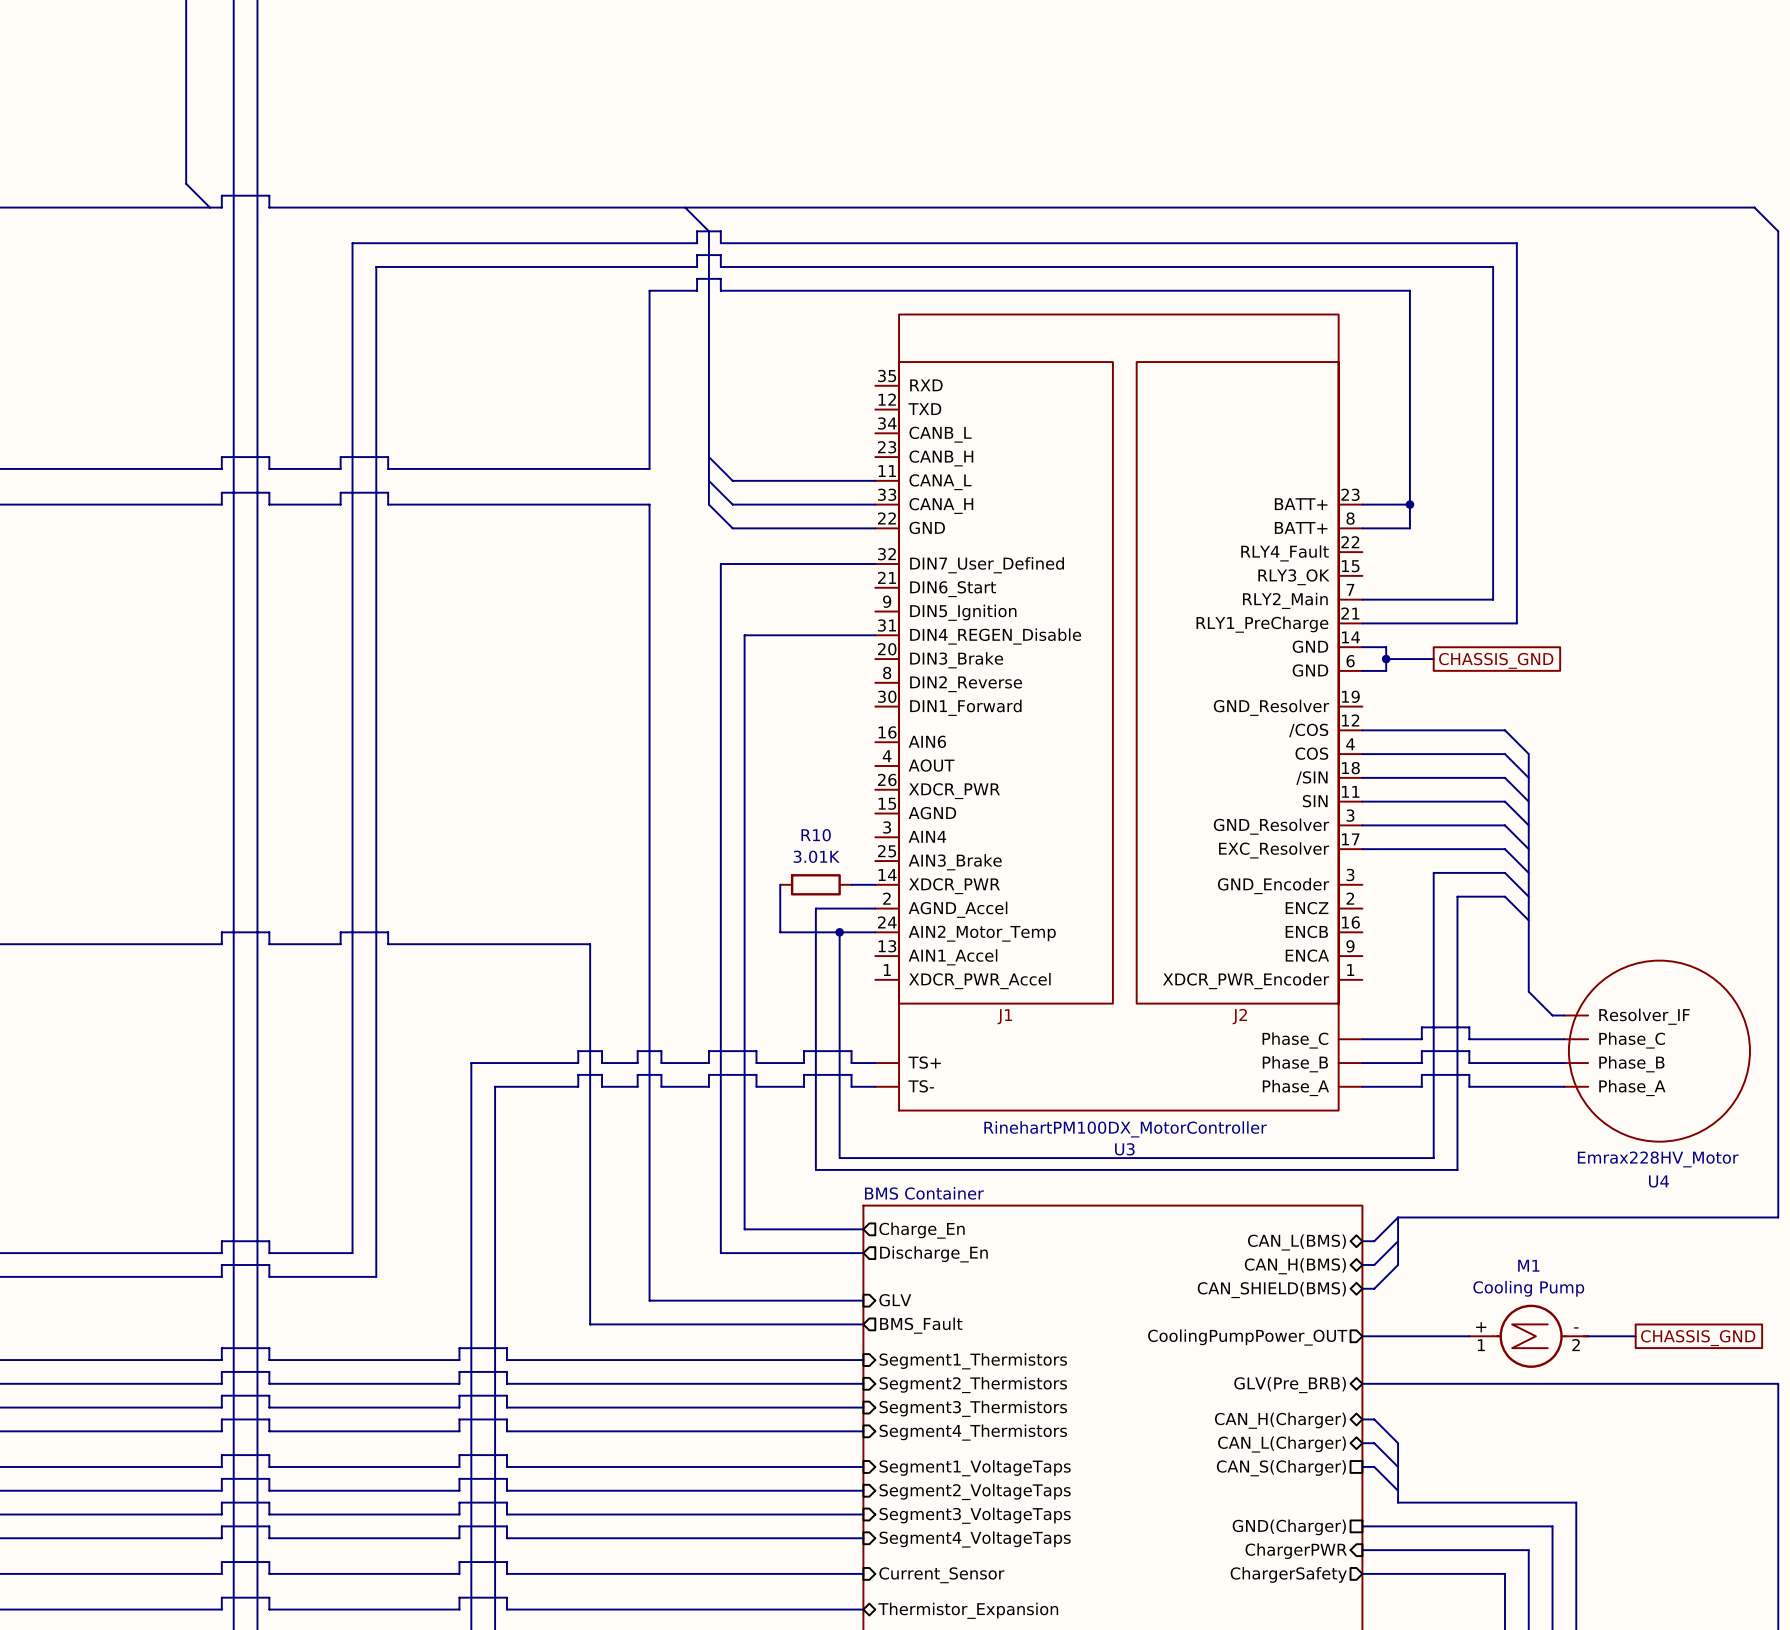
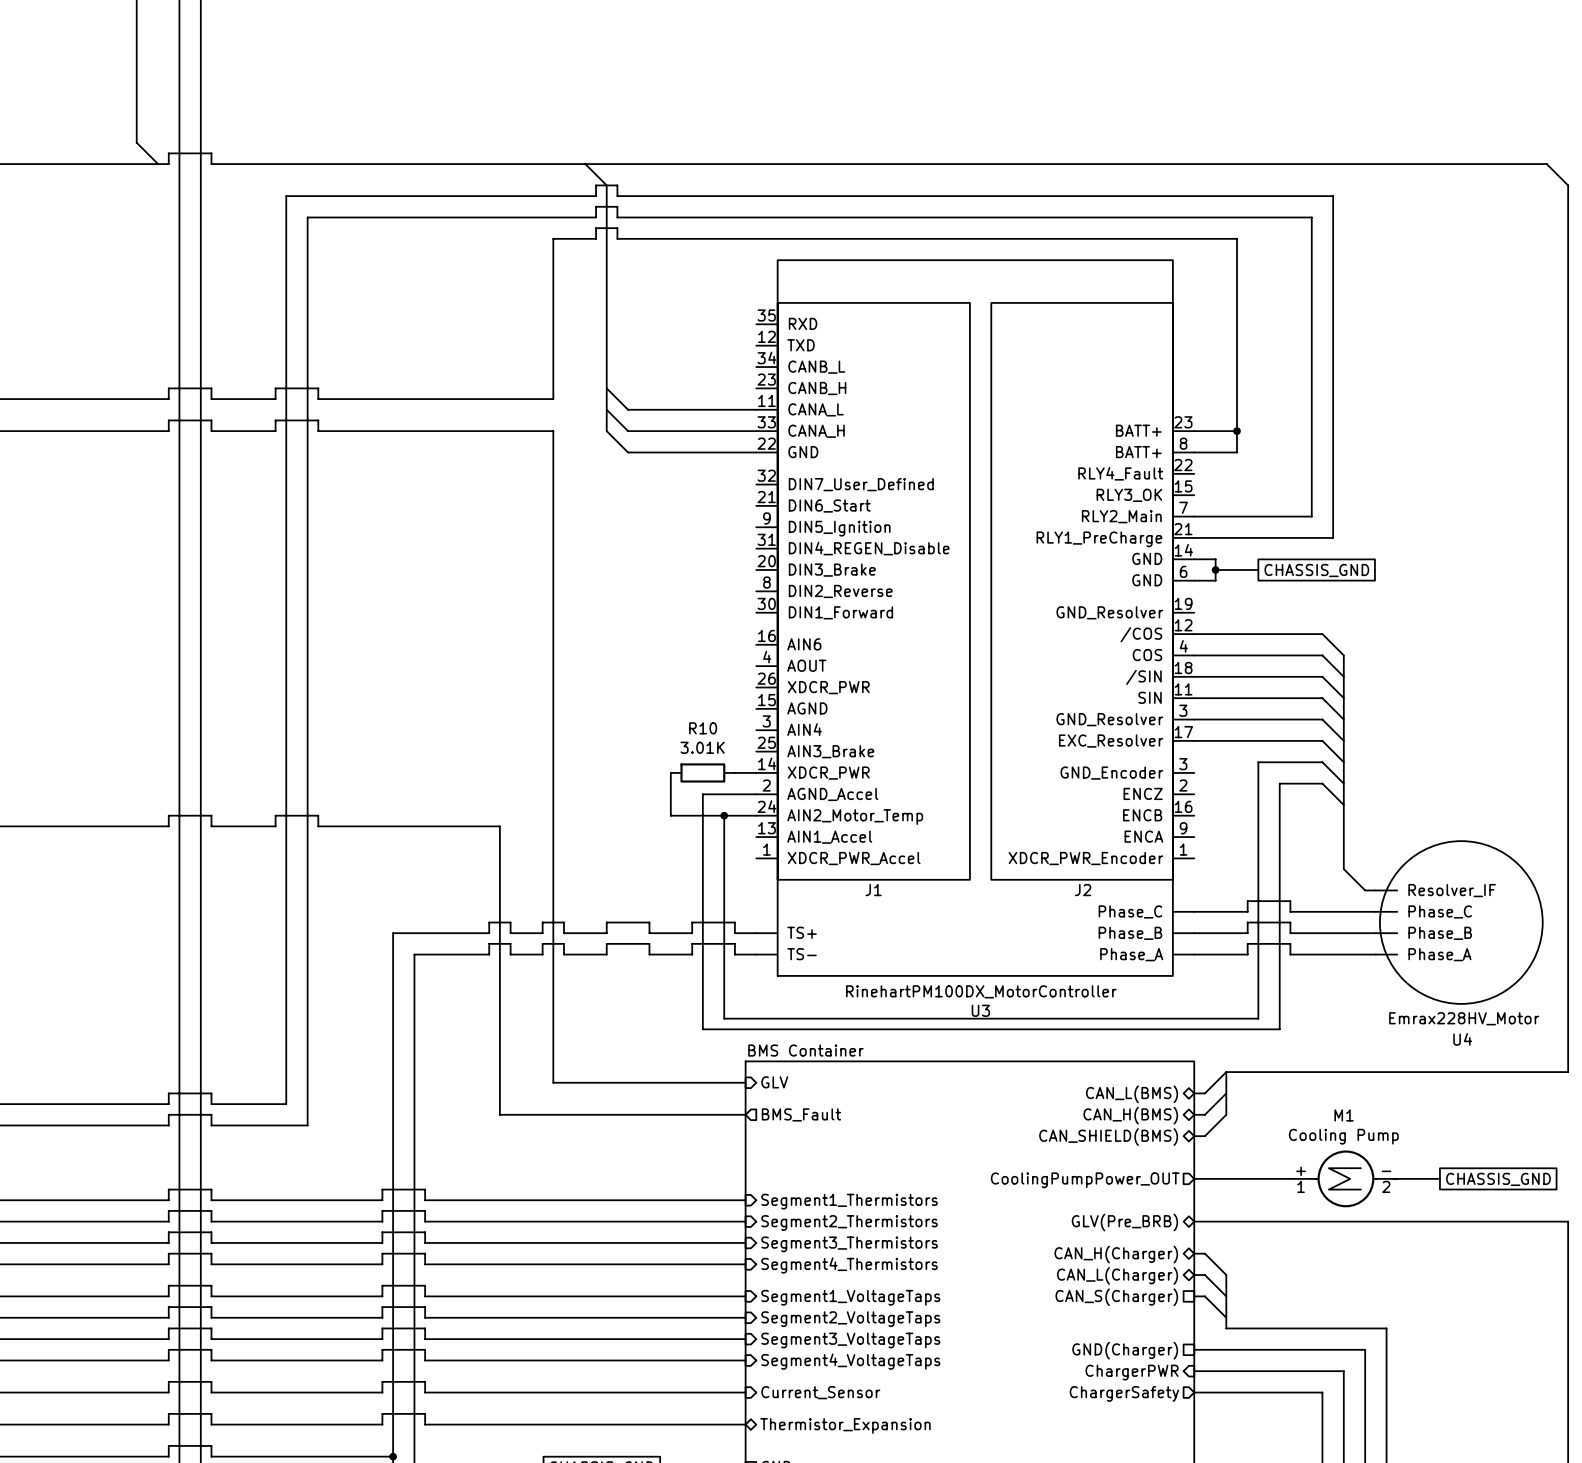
wire: (875, 564) (720, 564) (720, 1253) (863, 1253) -> none
wire: (875, 635) (744, 635) (744, 1229) -> none
wire: (649, 1229) (649, 1300) (863, 1300) -> (553, 1082) (638, 1082)
sheet pin shape: output (922, 1230) -> input (774, 1082)
sheet pin: Charge_En (922, 1230) -> GLV (774, 1082)
sheet pin: Discharge_En (933, 1254) -> none
wire: (590, 1265) (590, 1324) (863, 1324) -> (499, 1114) (745, 1114)
sheet pin: GLV (895, 1300) -> none
sheet pin position: BMS_Fault (921, 1325) -> BMS_Fault (801, 1114)

